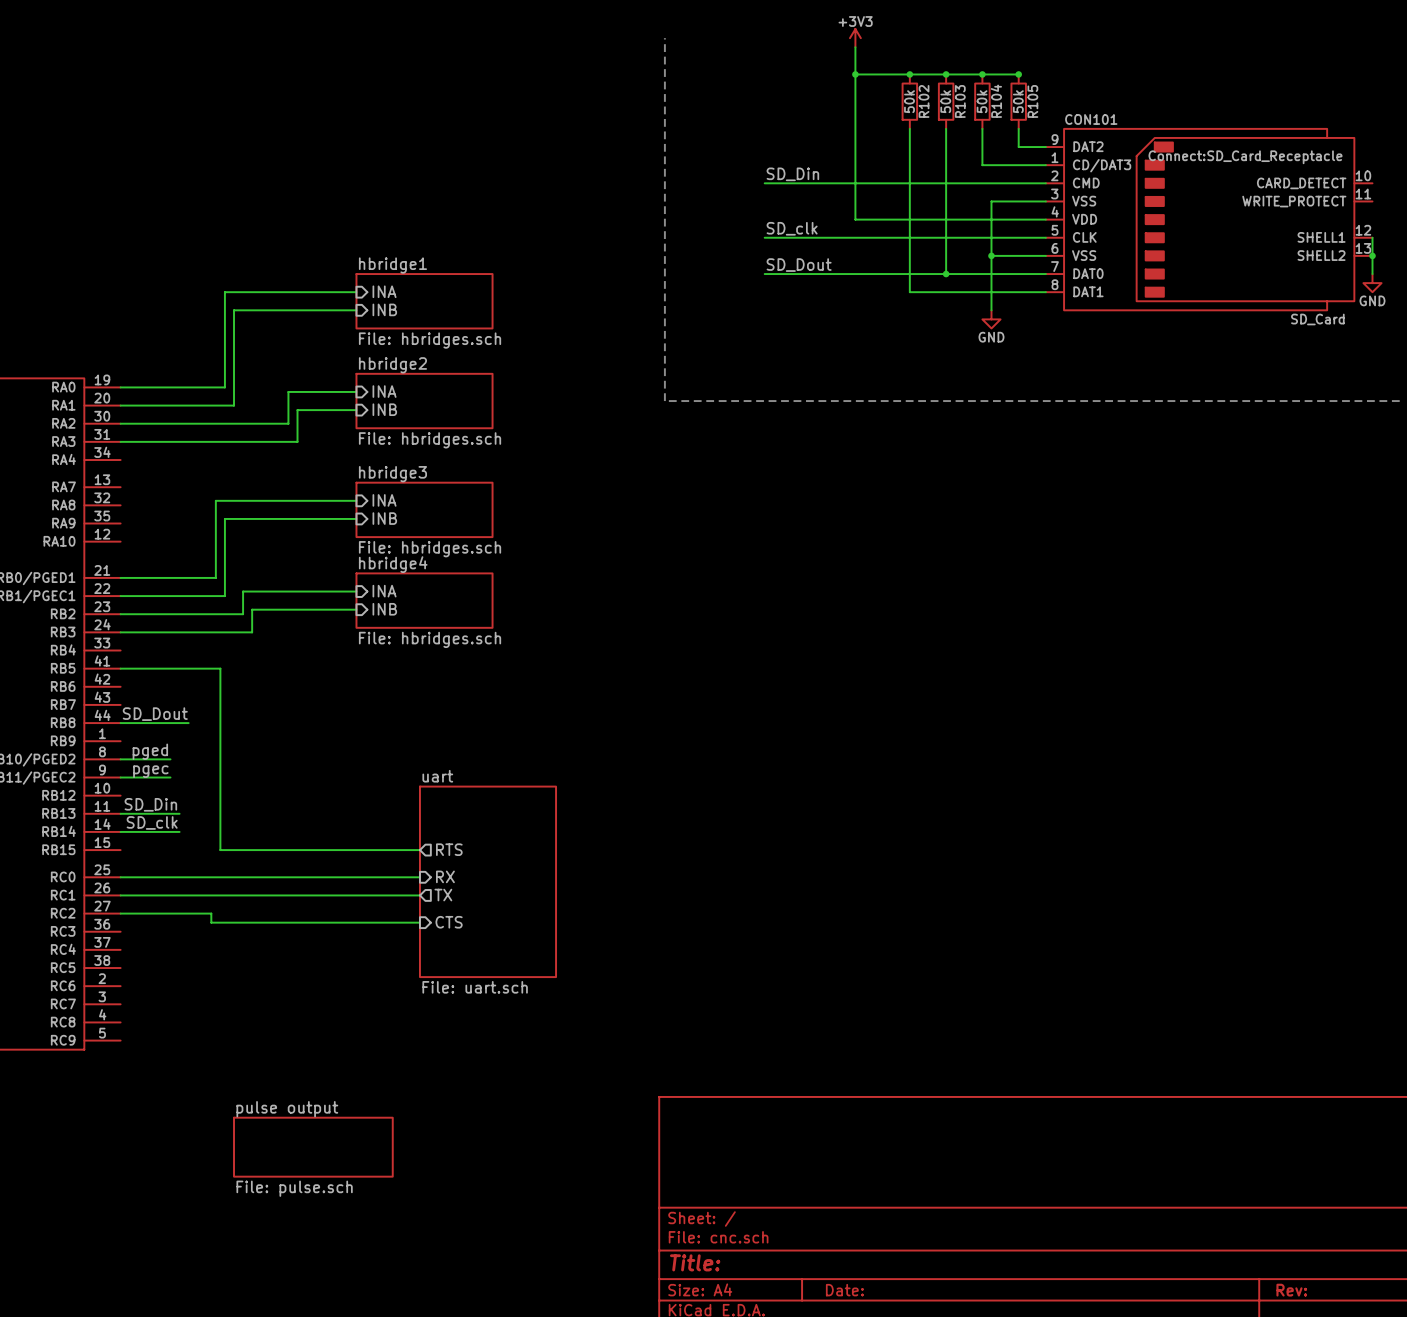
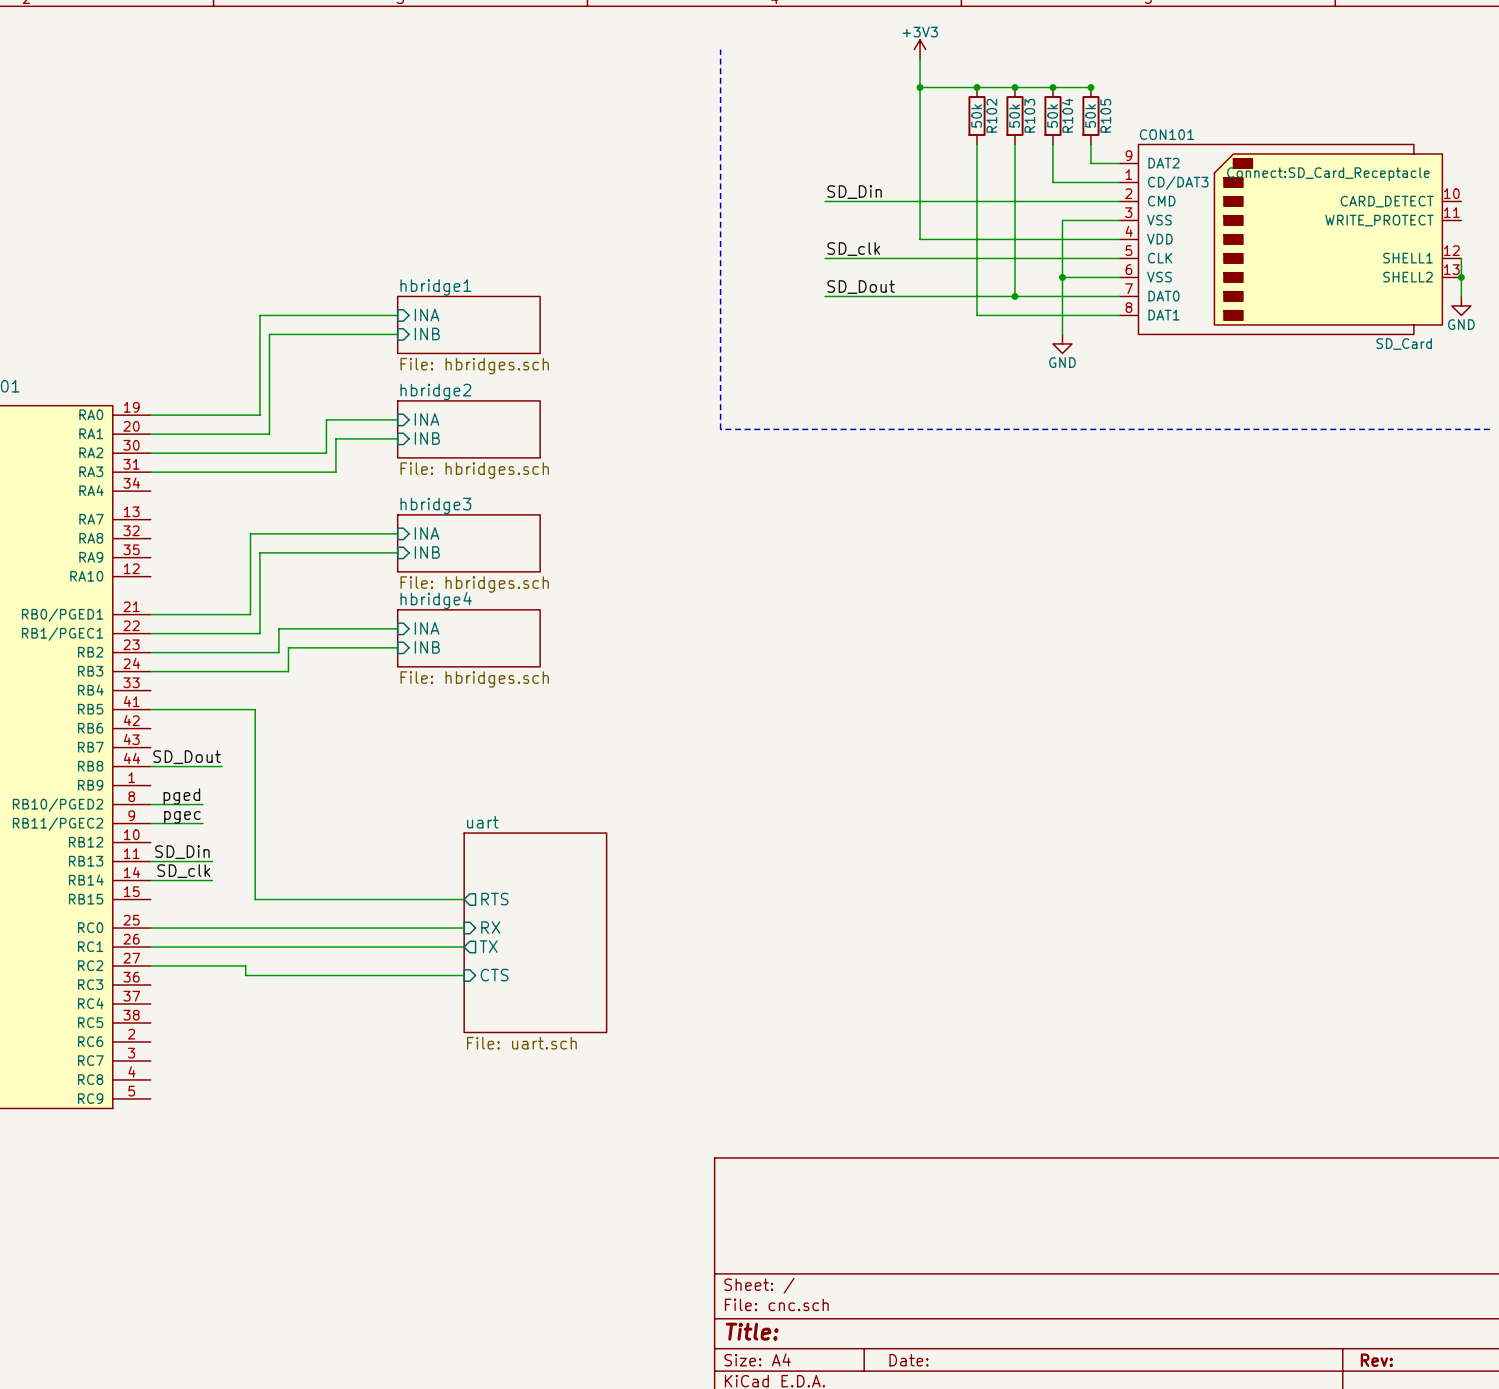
sheet pulse output: File: pulse.sch (313, 1147) -> none

